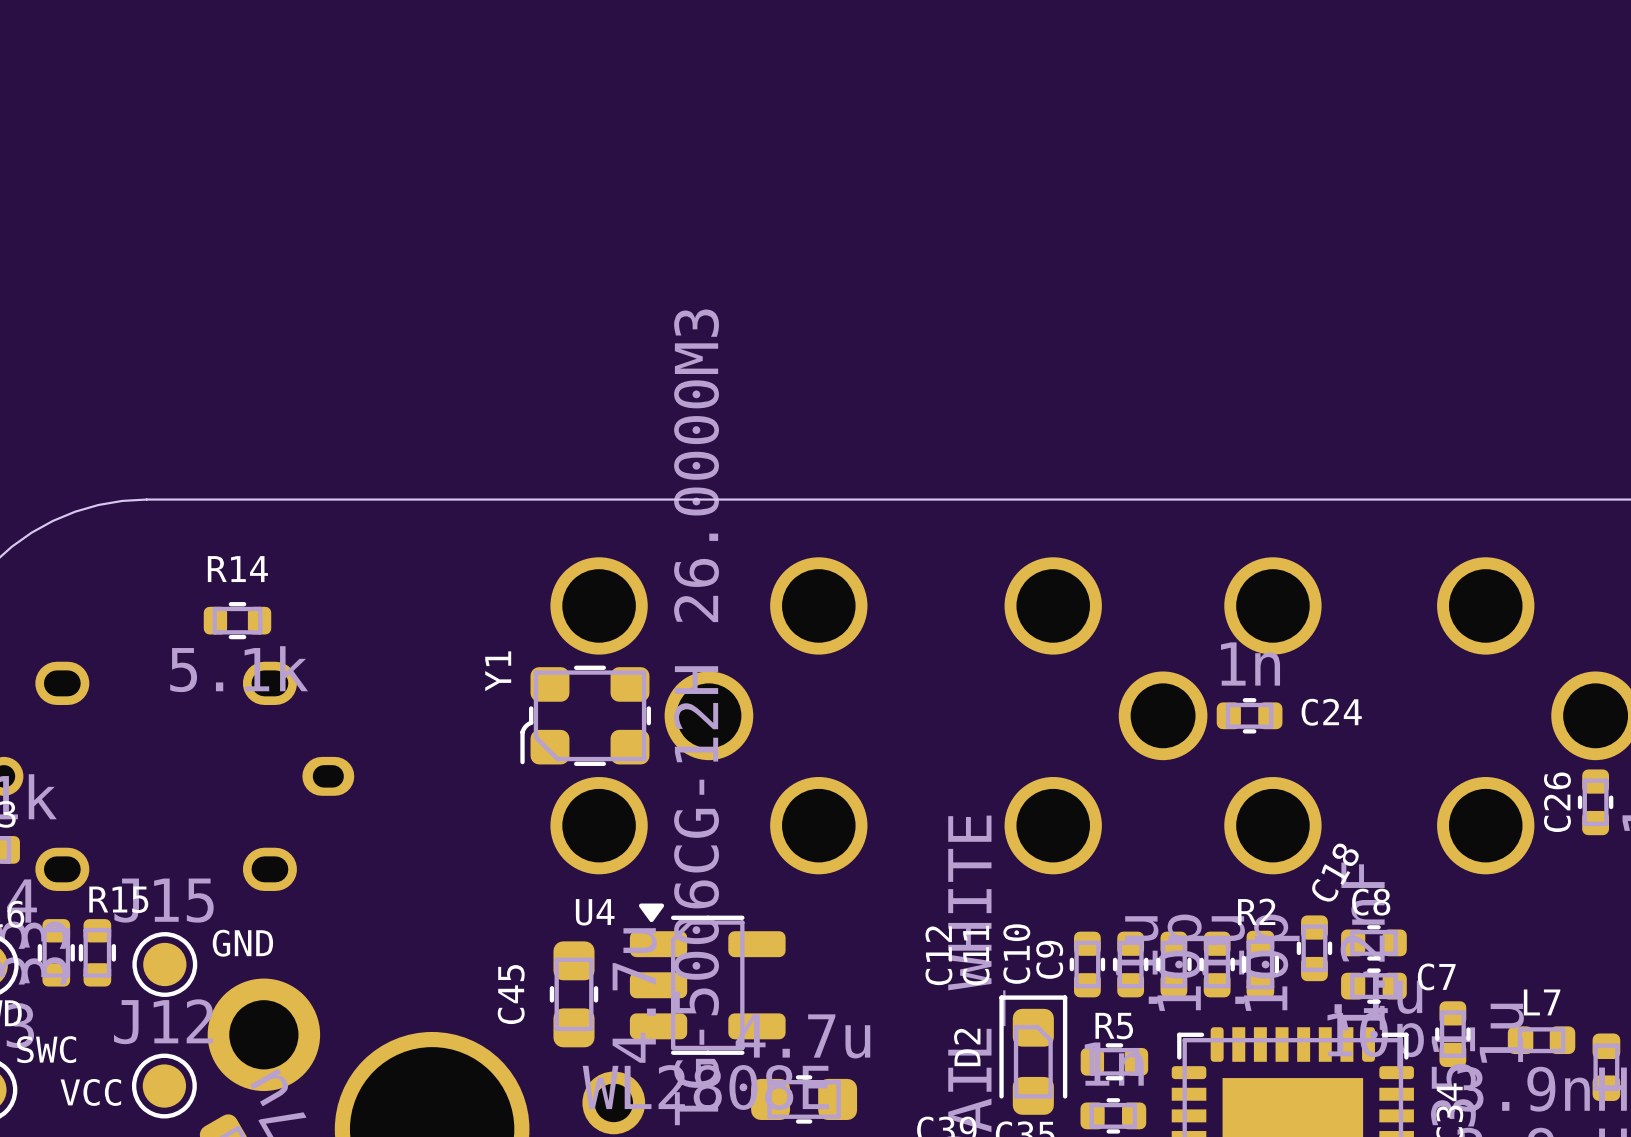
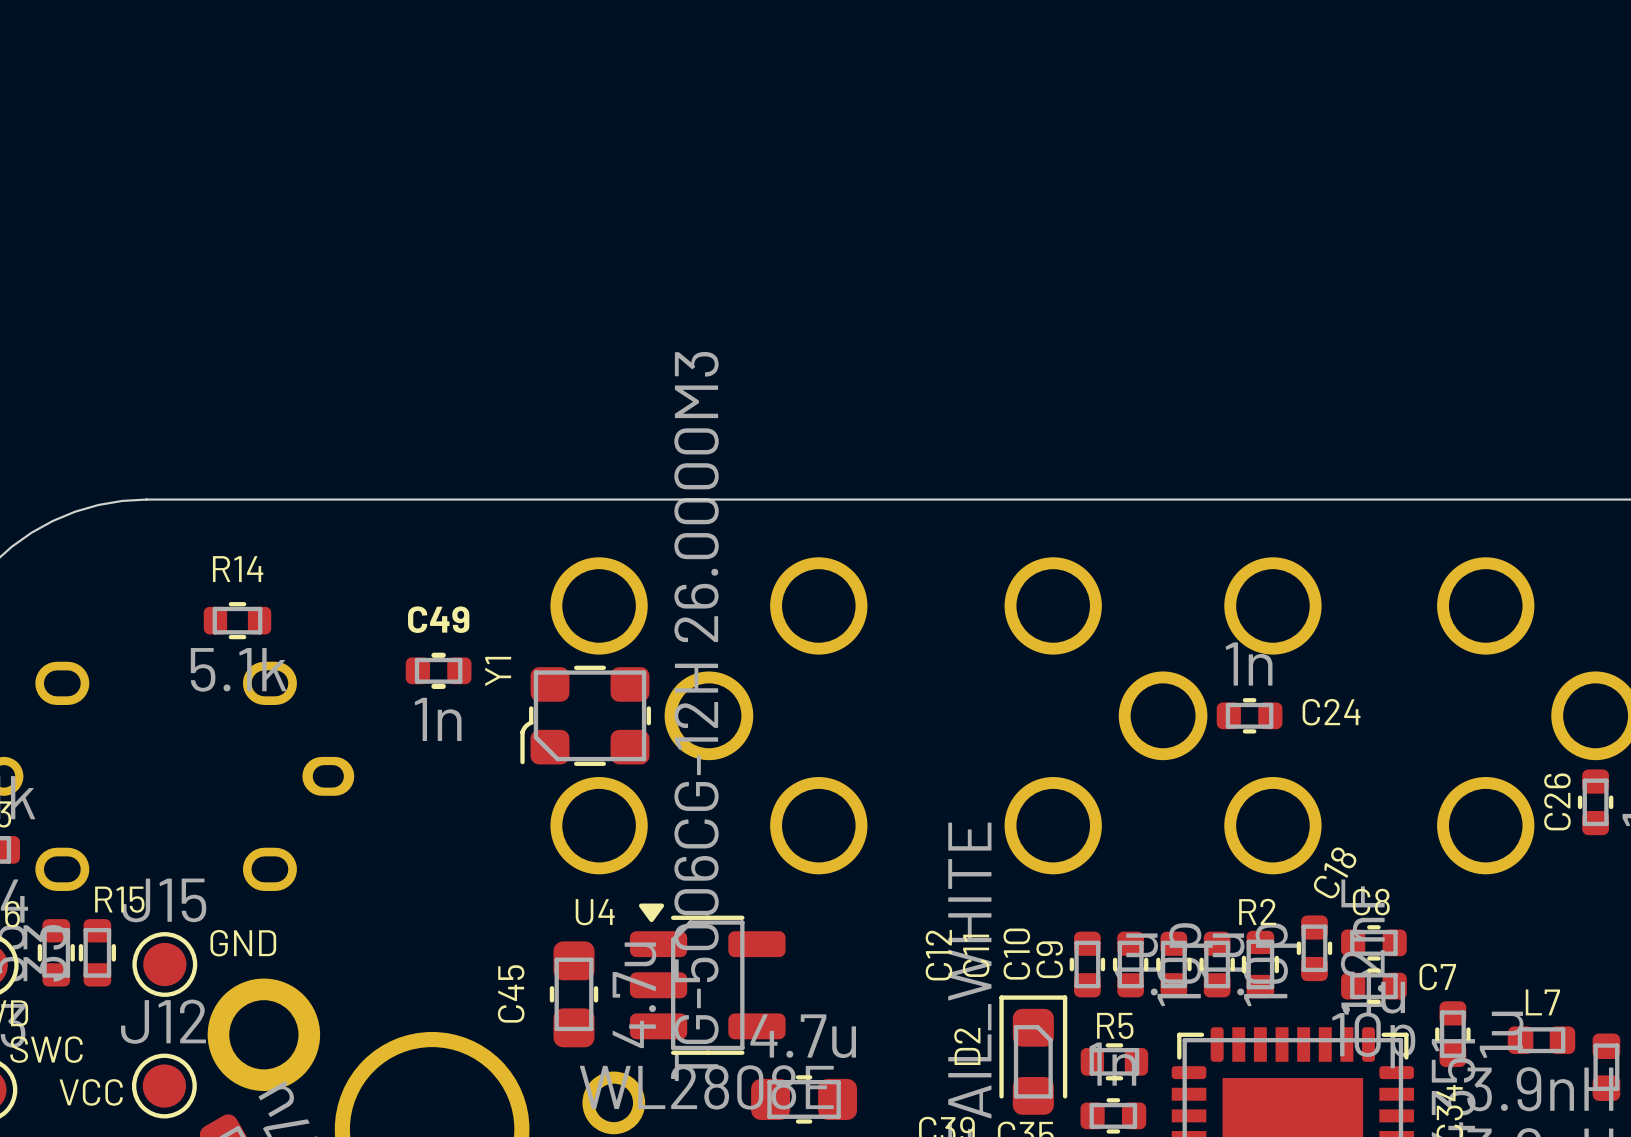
C49: none -> 1n (438, 670)

